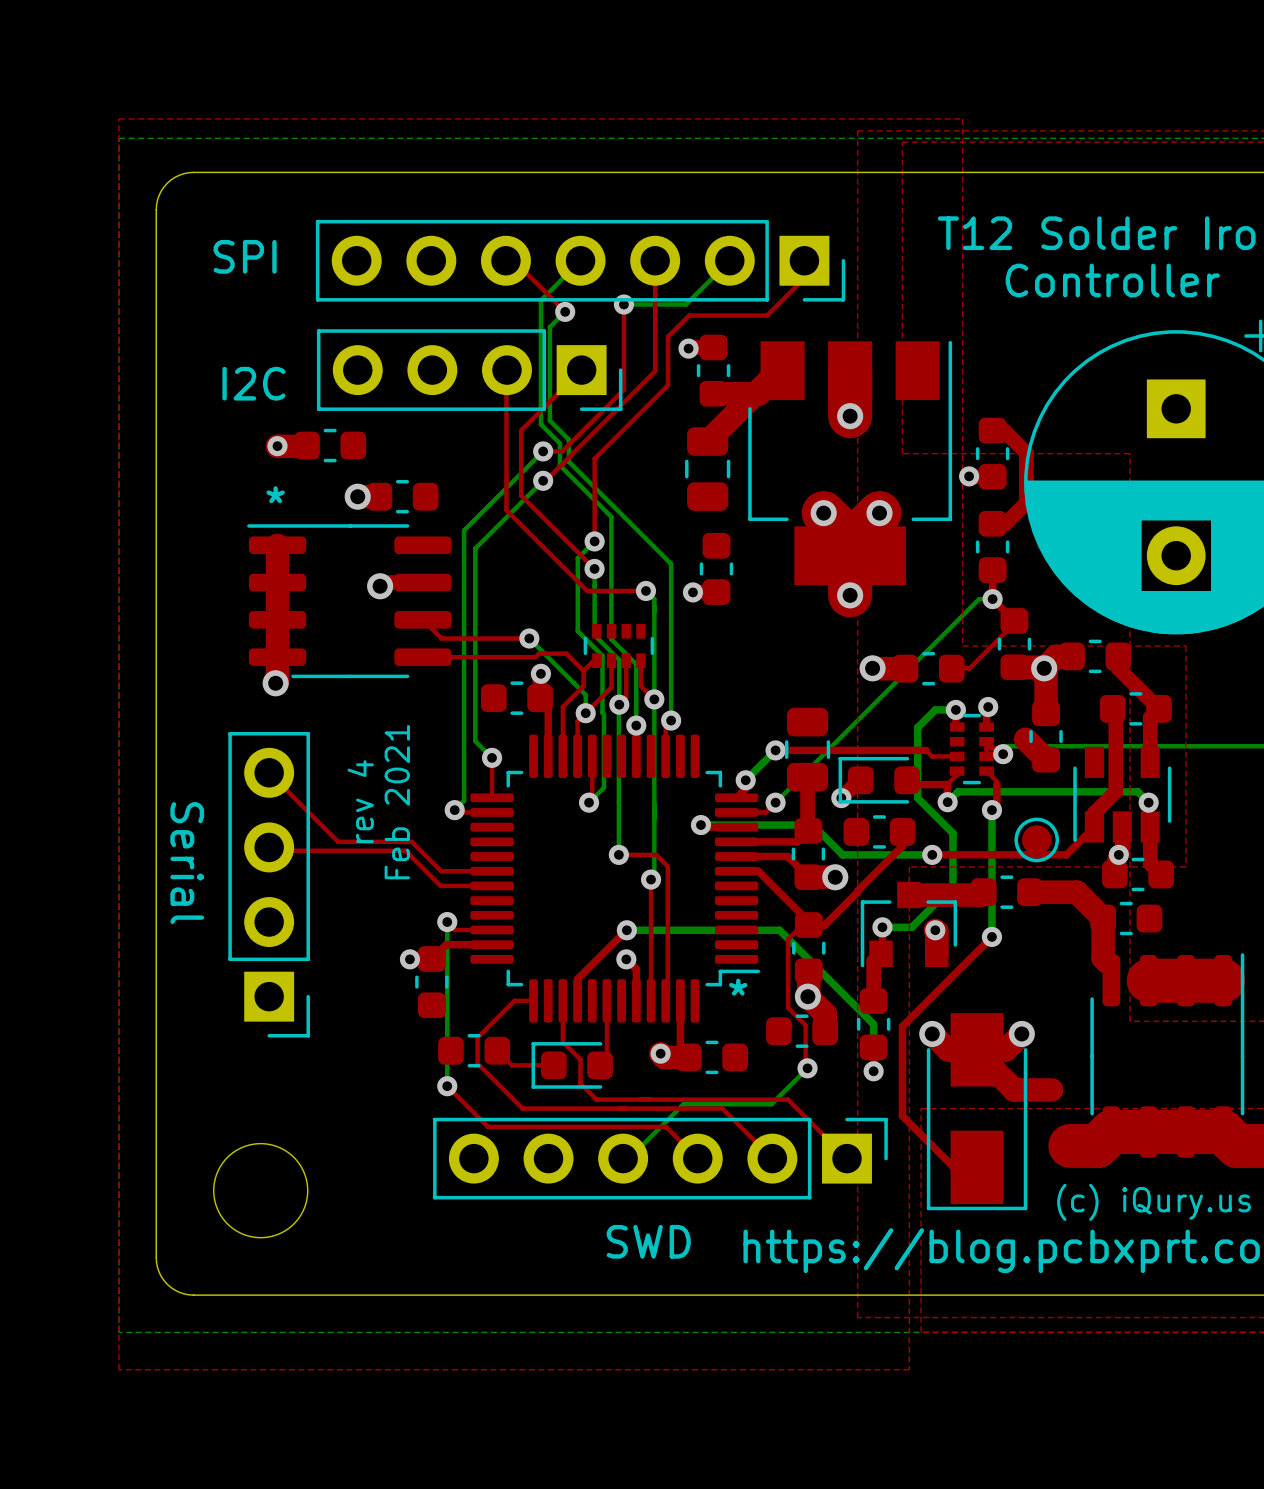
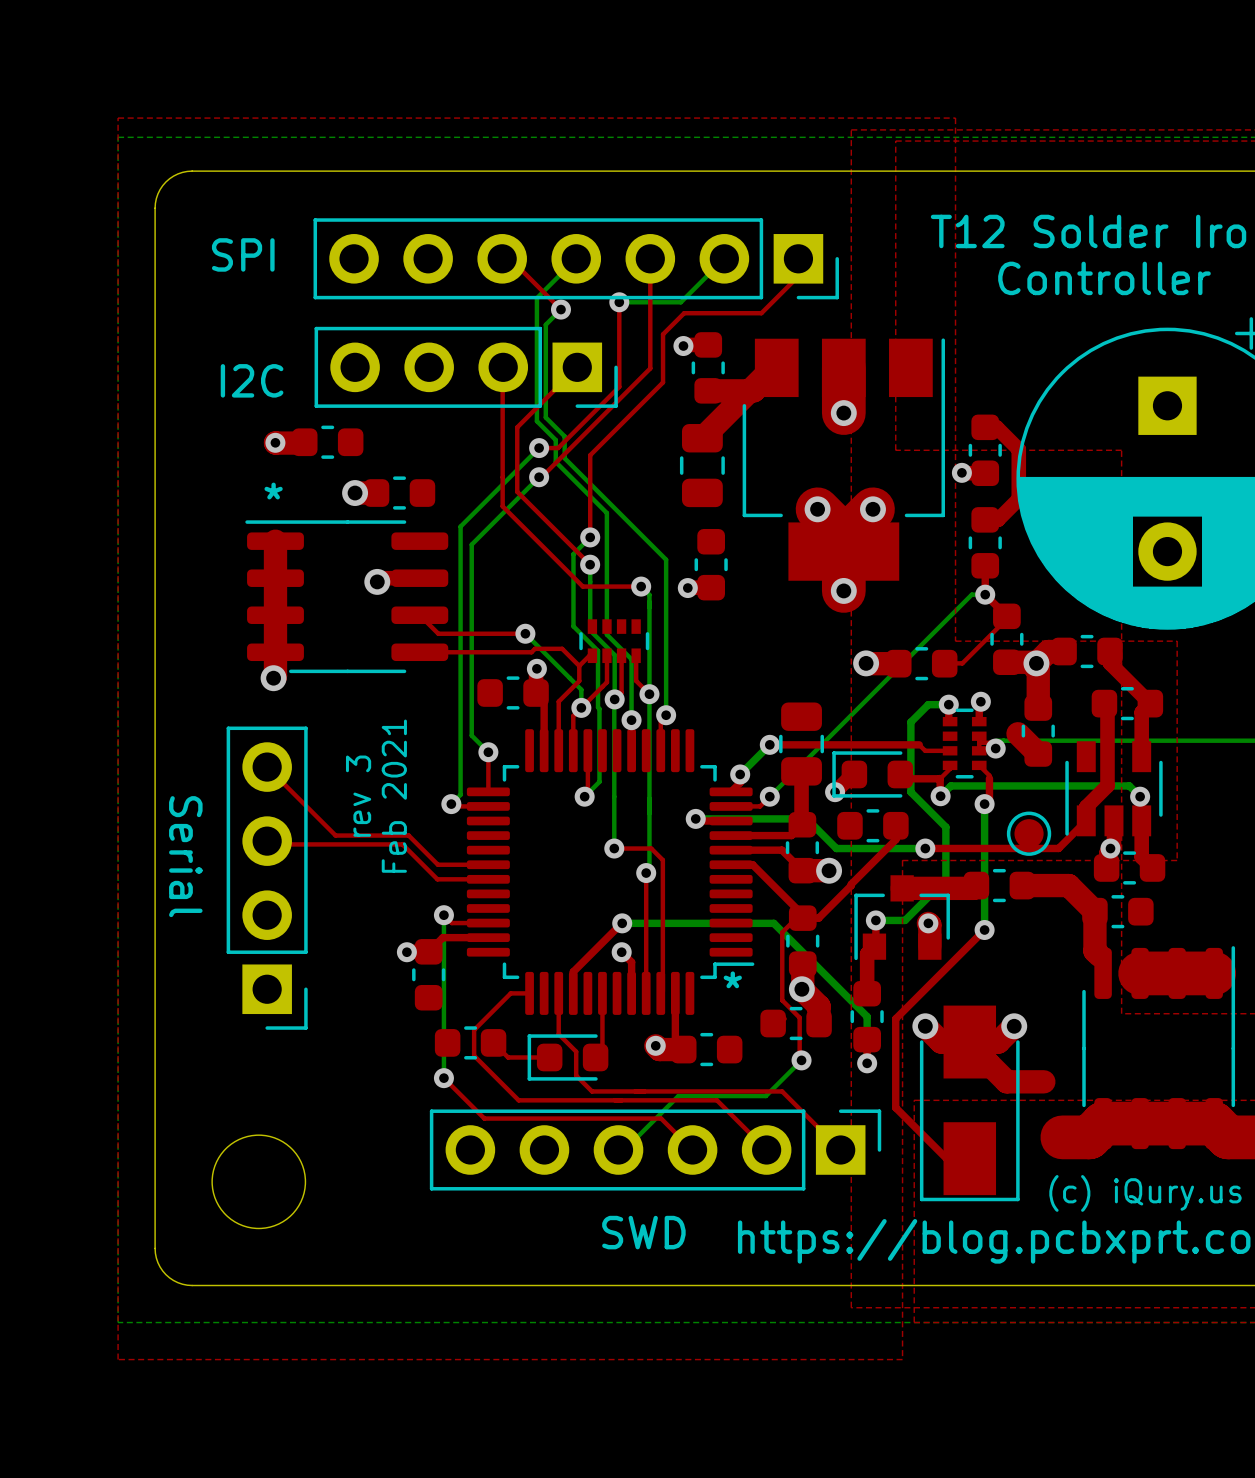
text: rev 4 (360, 801) -> rev 3 (358, 796)

